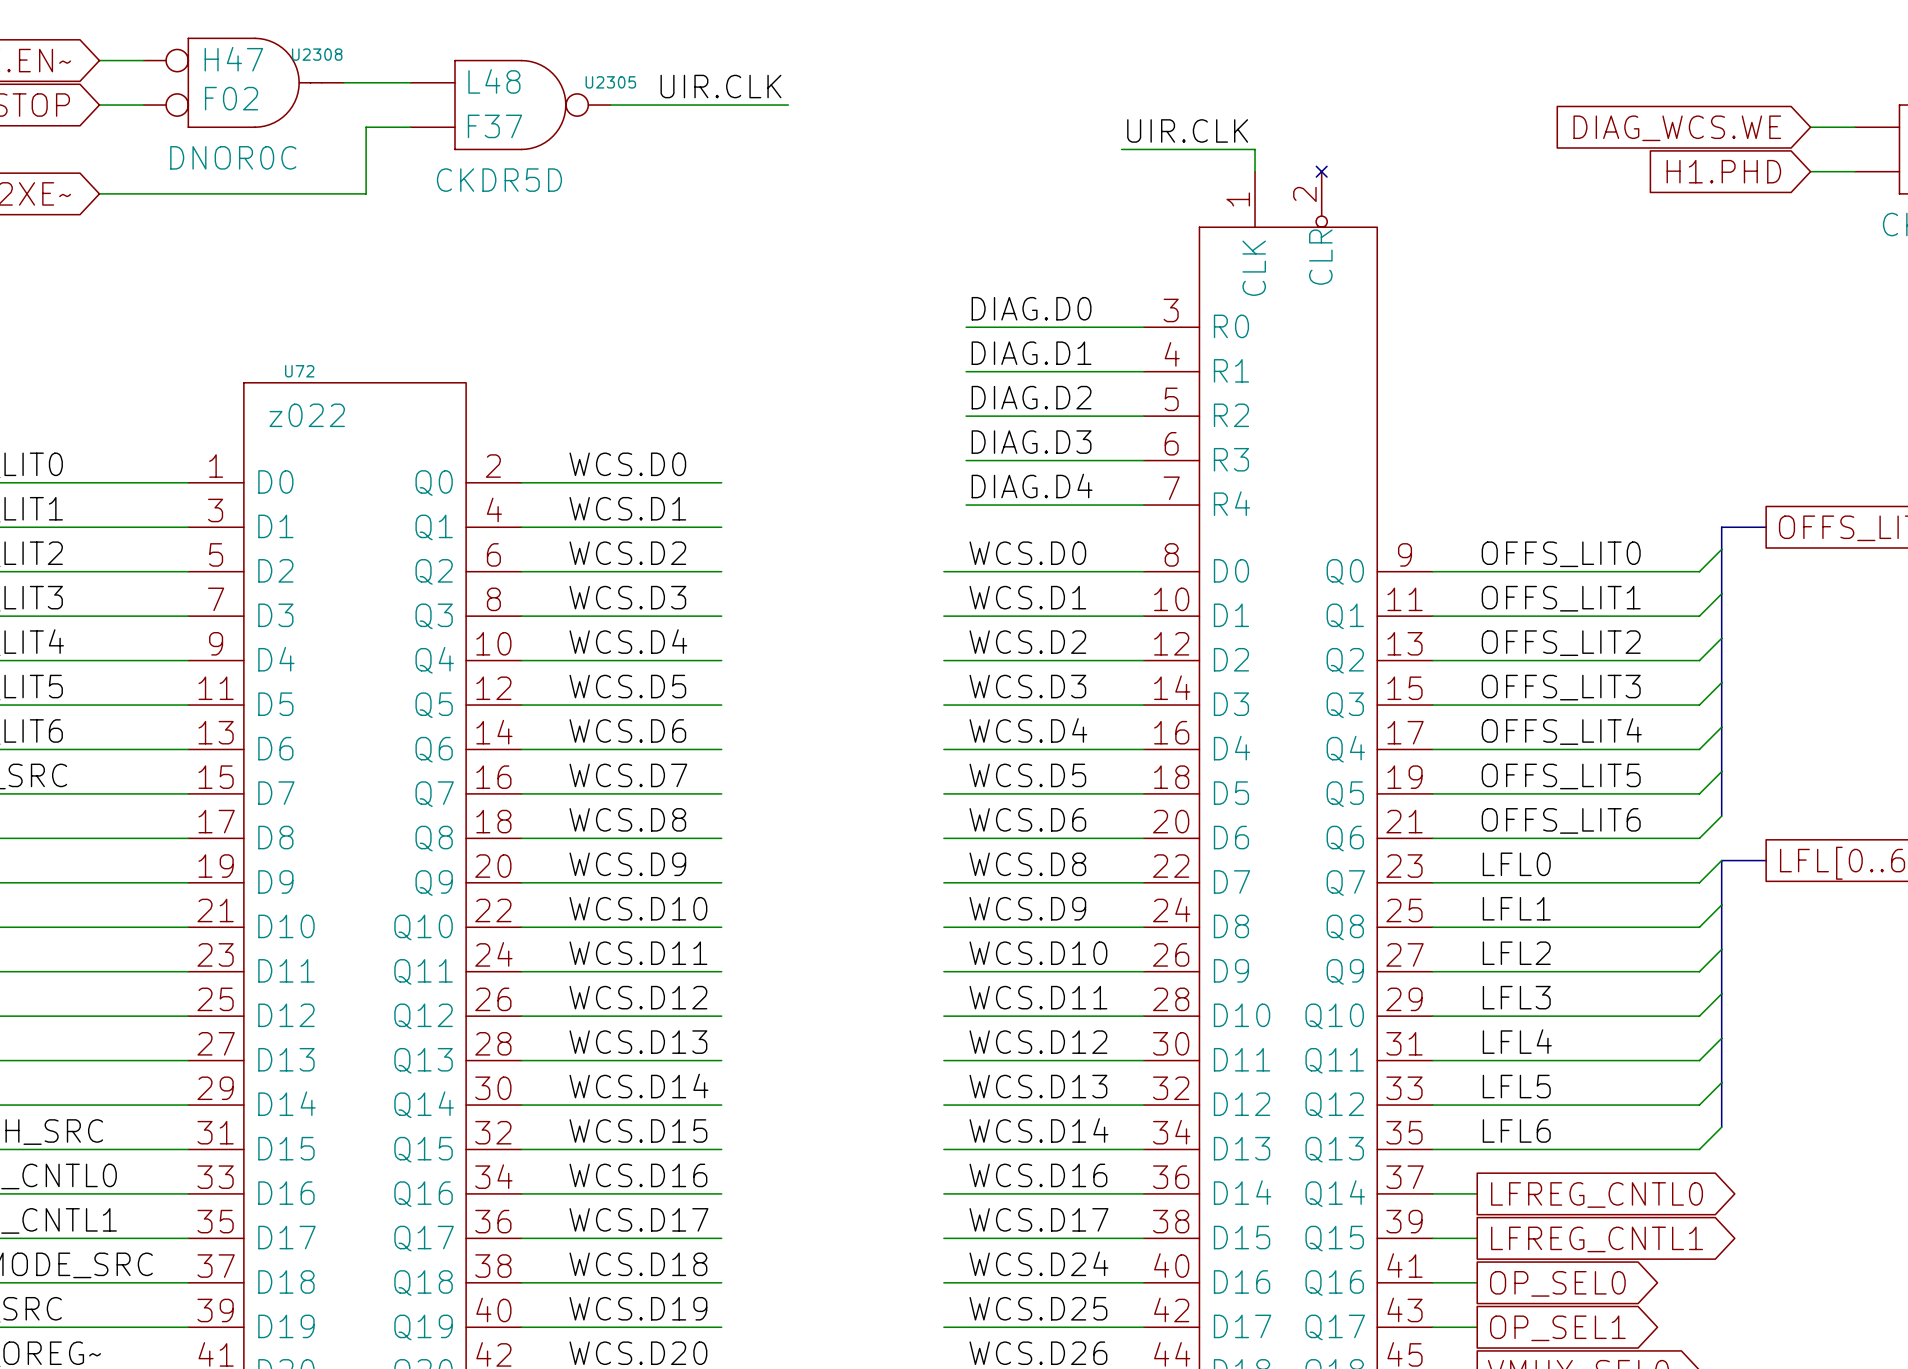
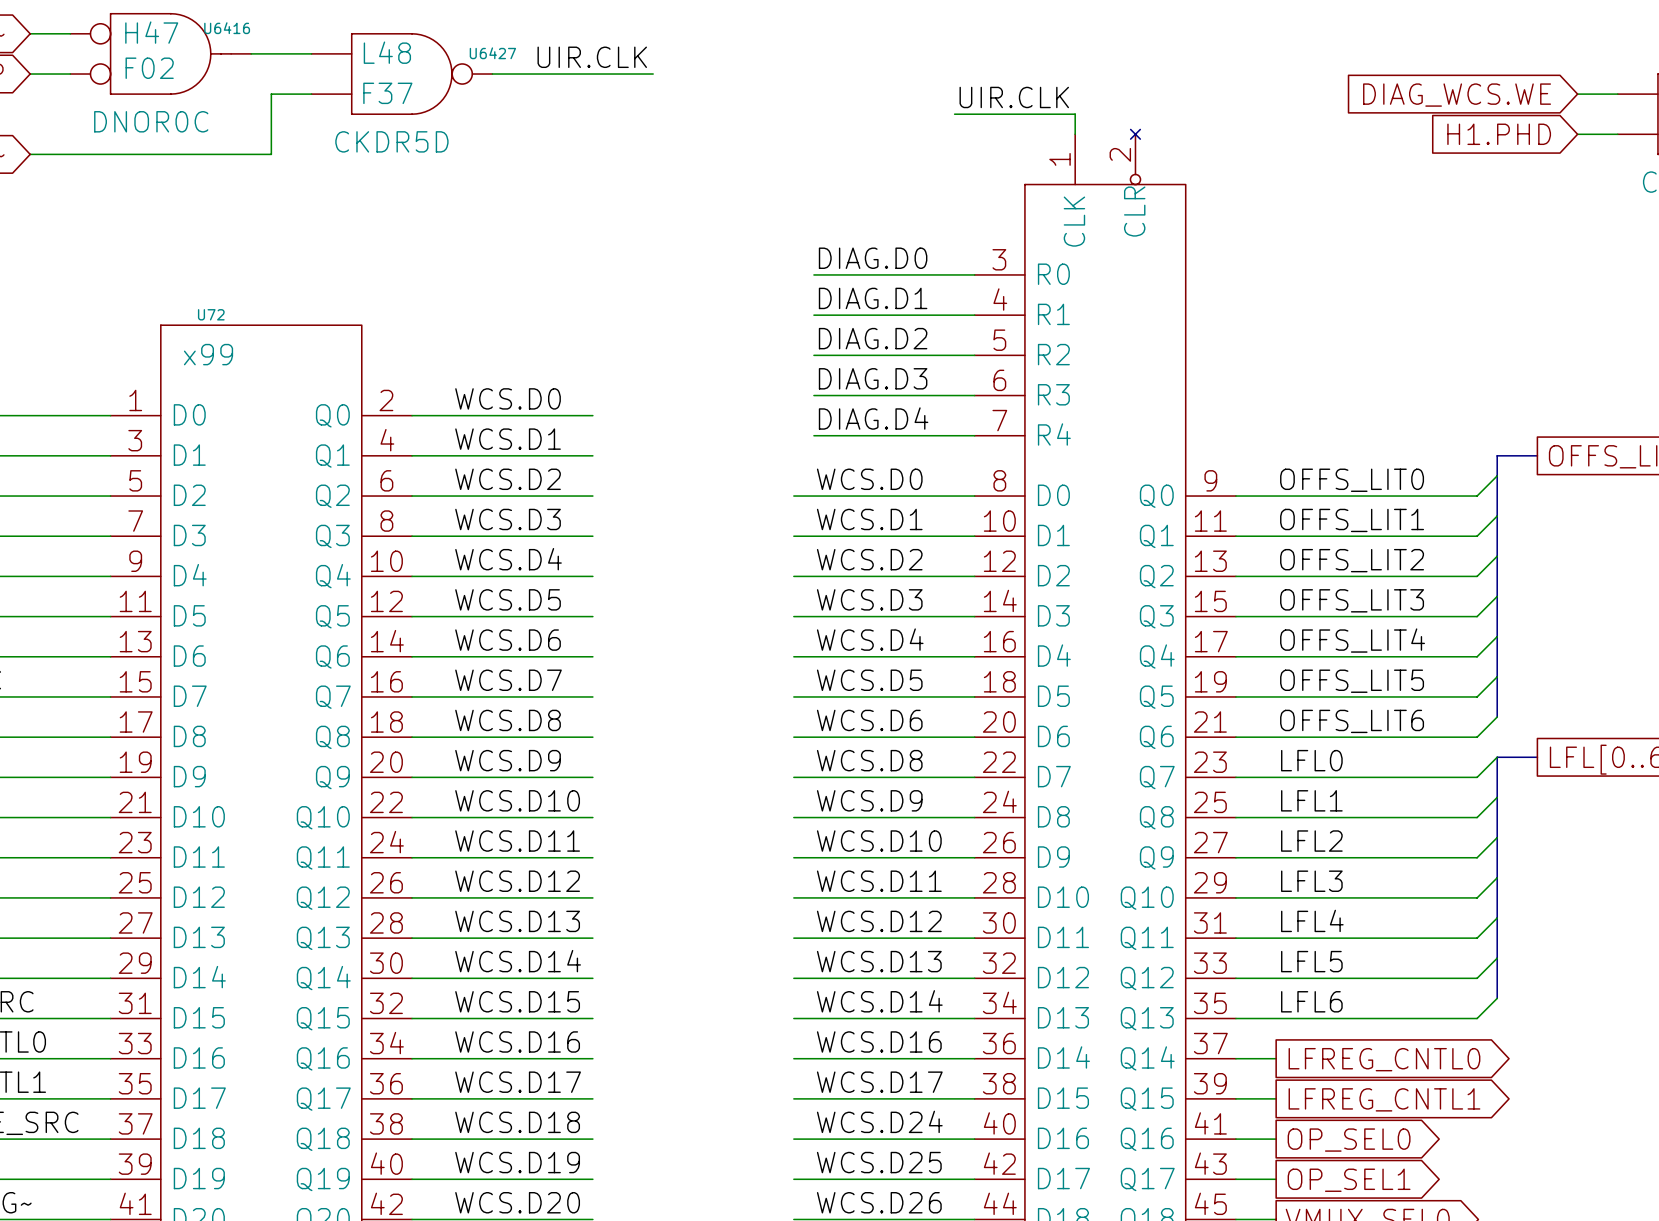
U2308 name: U2308 (317, 54) -> U6416 (227, 28)
U2305 name: U2305 (610, 82) -> U6427 (492, 53)
U72 text: z022 (307, 415) -> x99 (208, 354)

